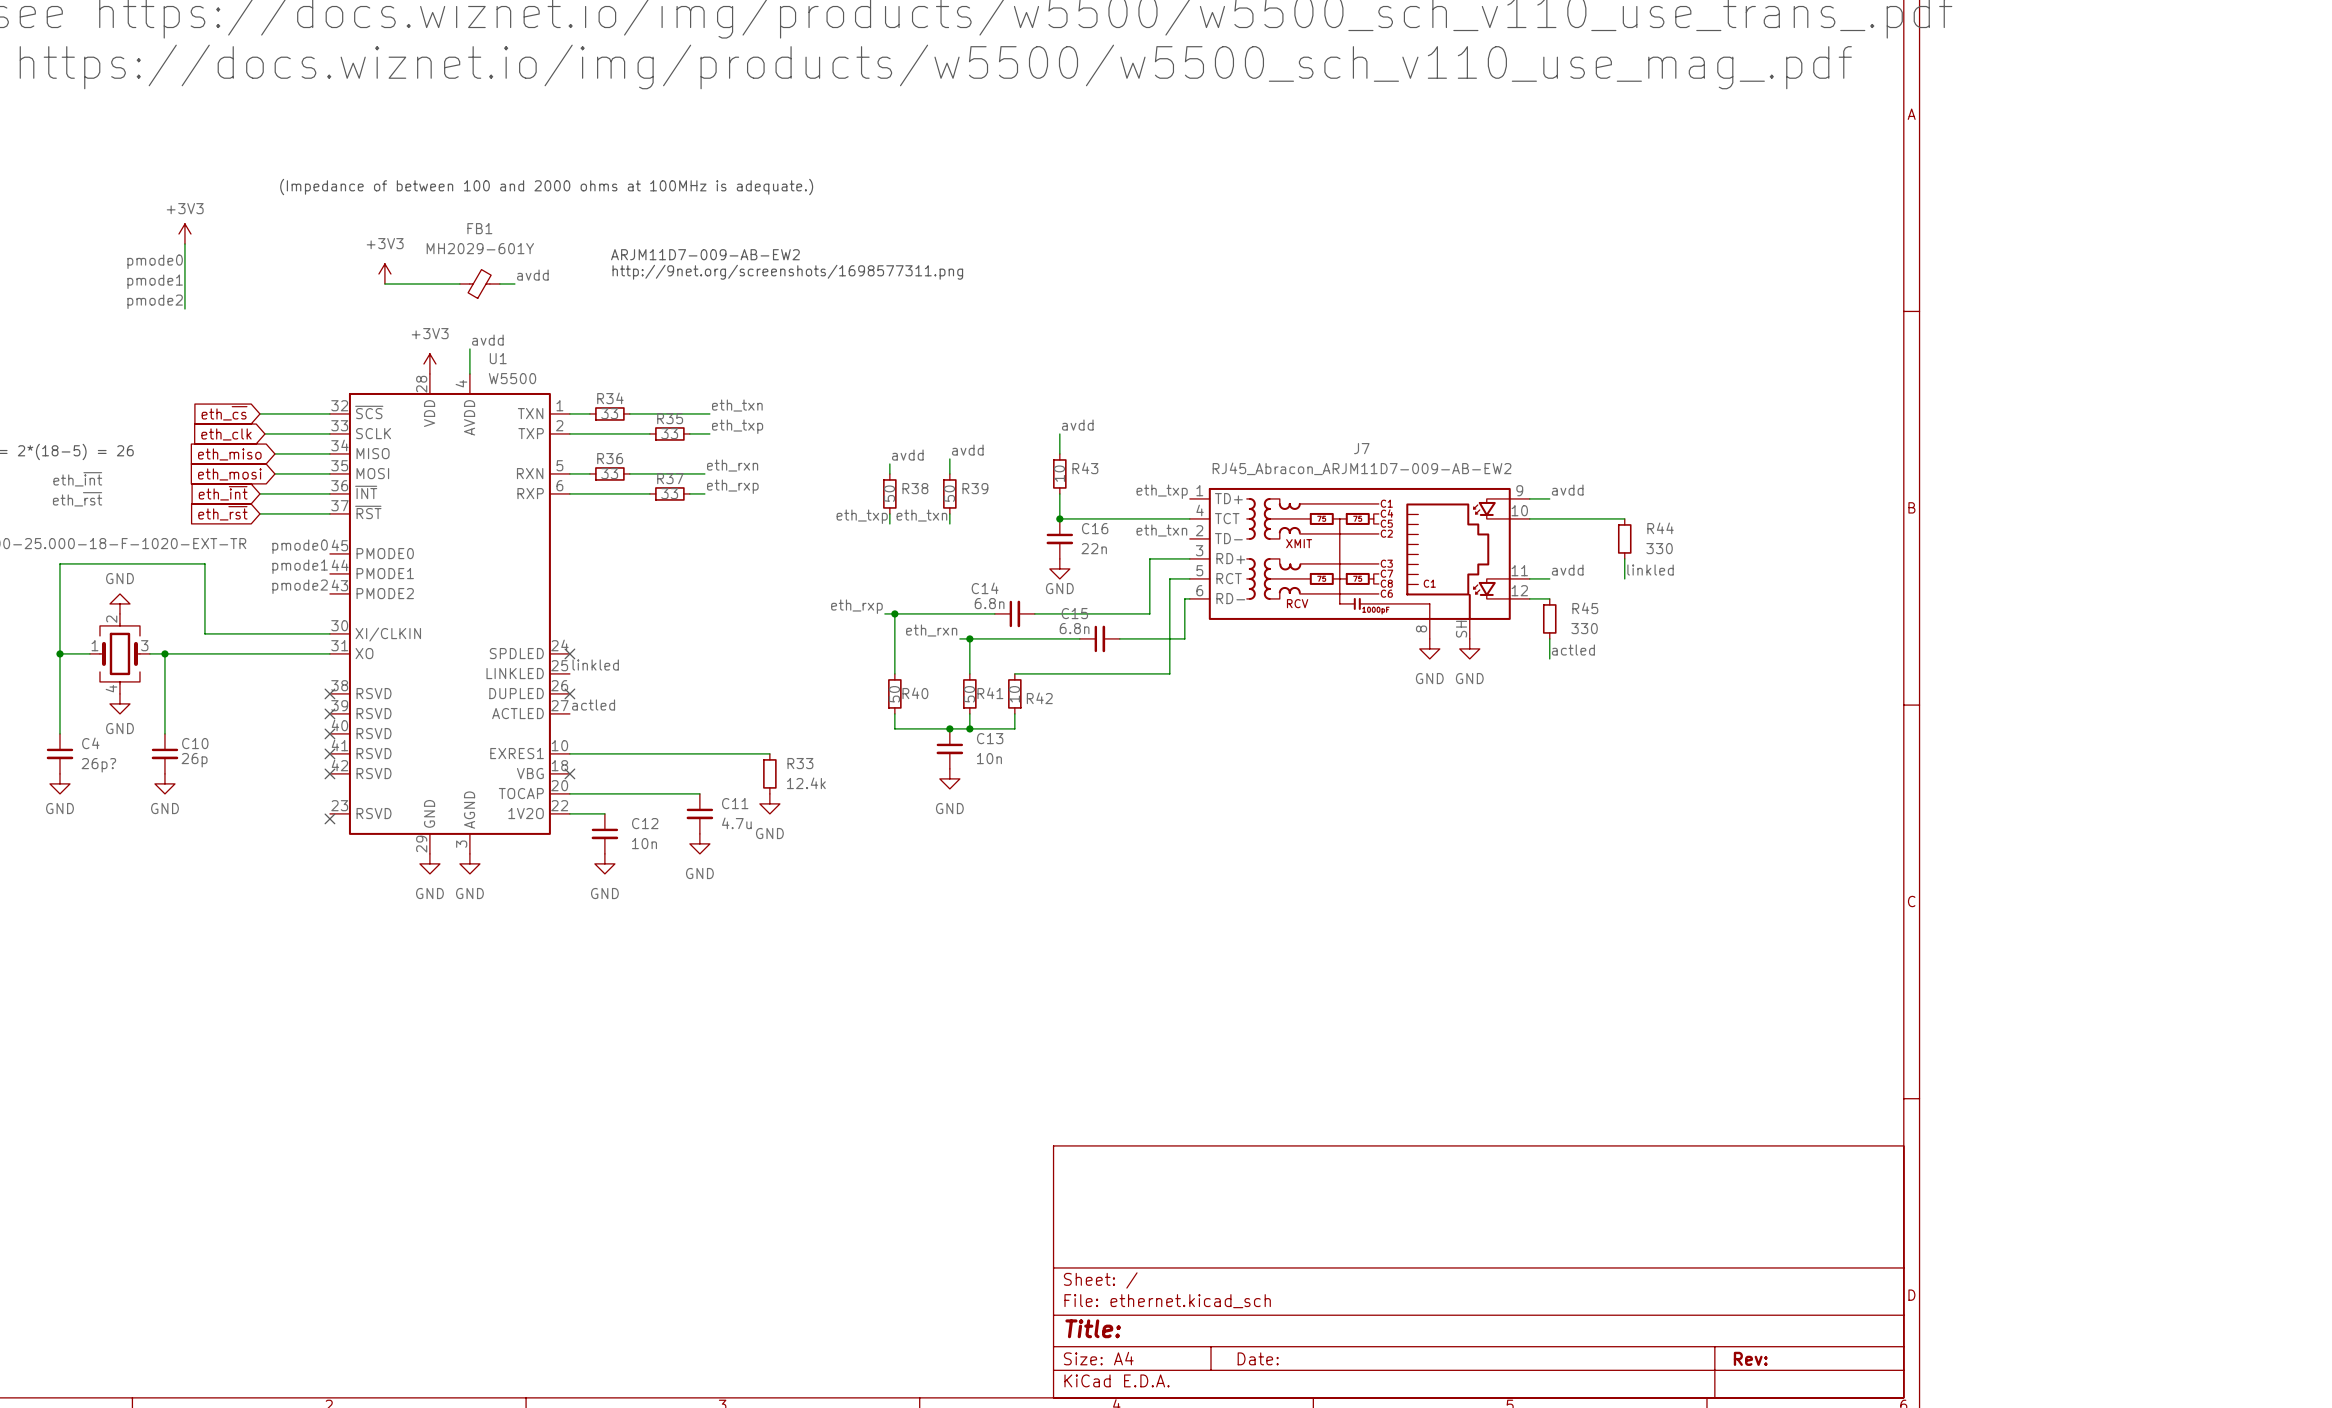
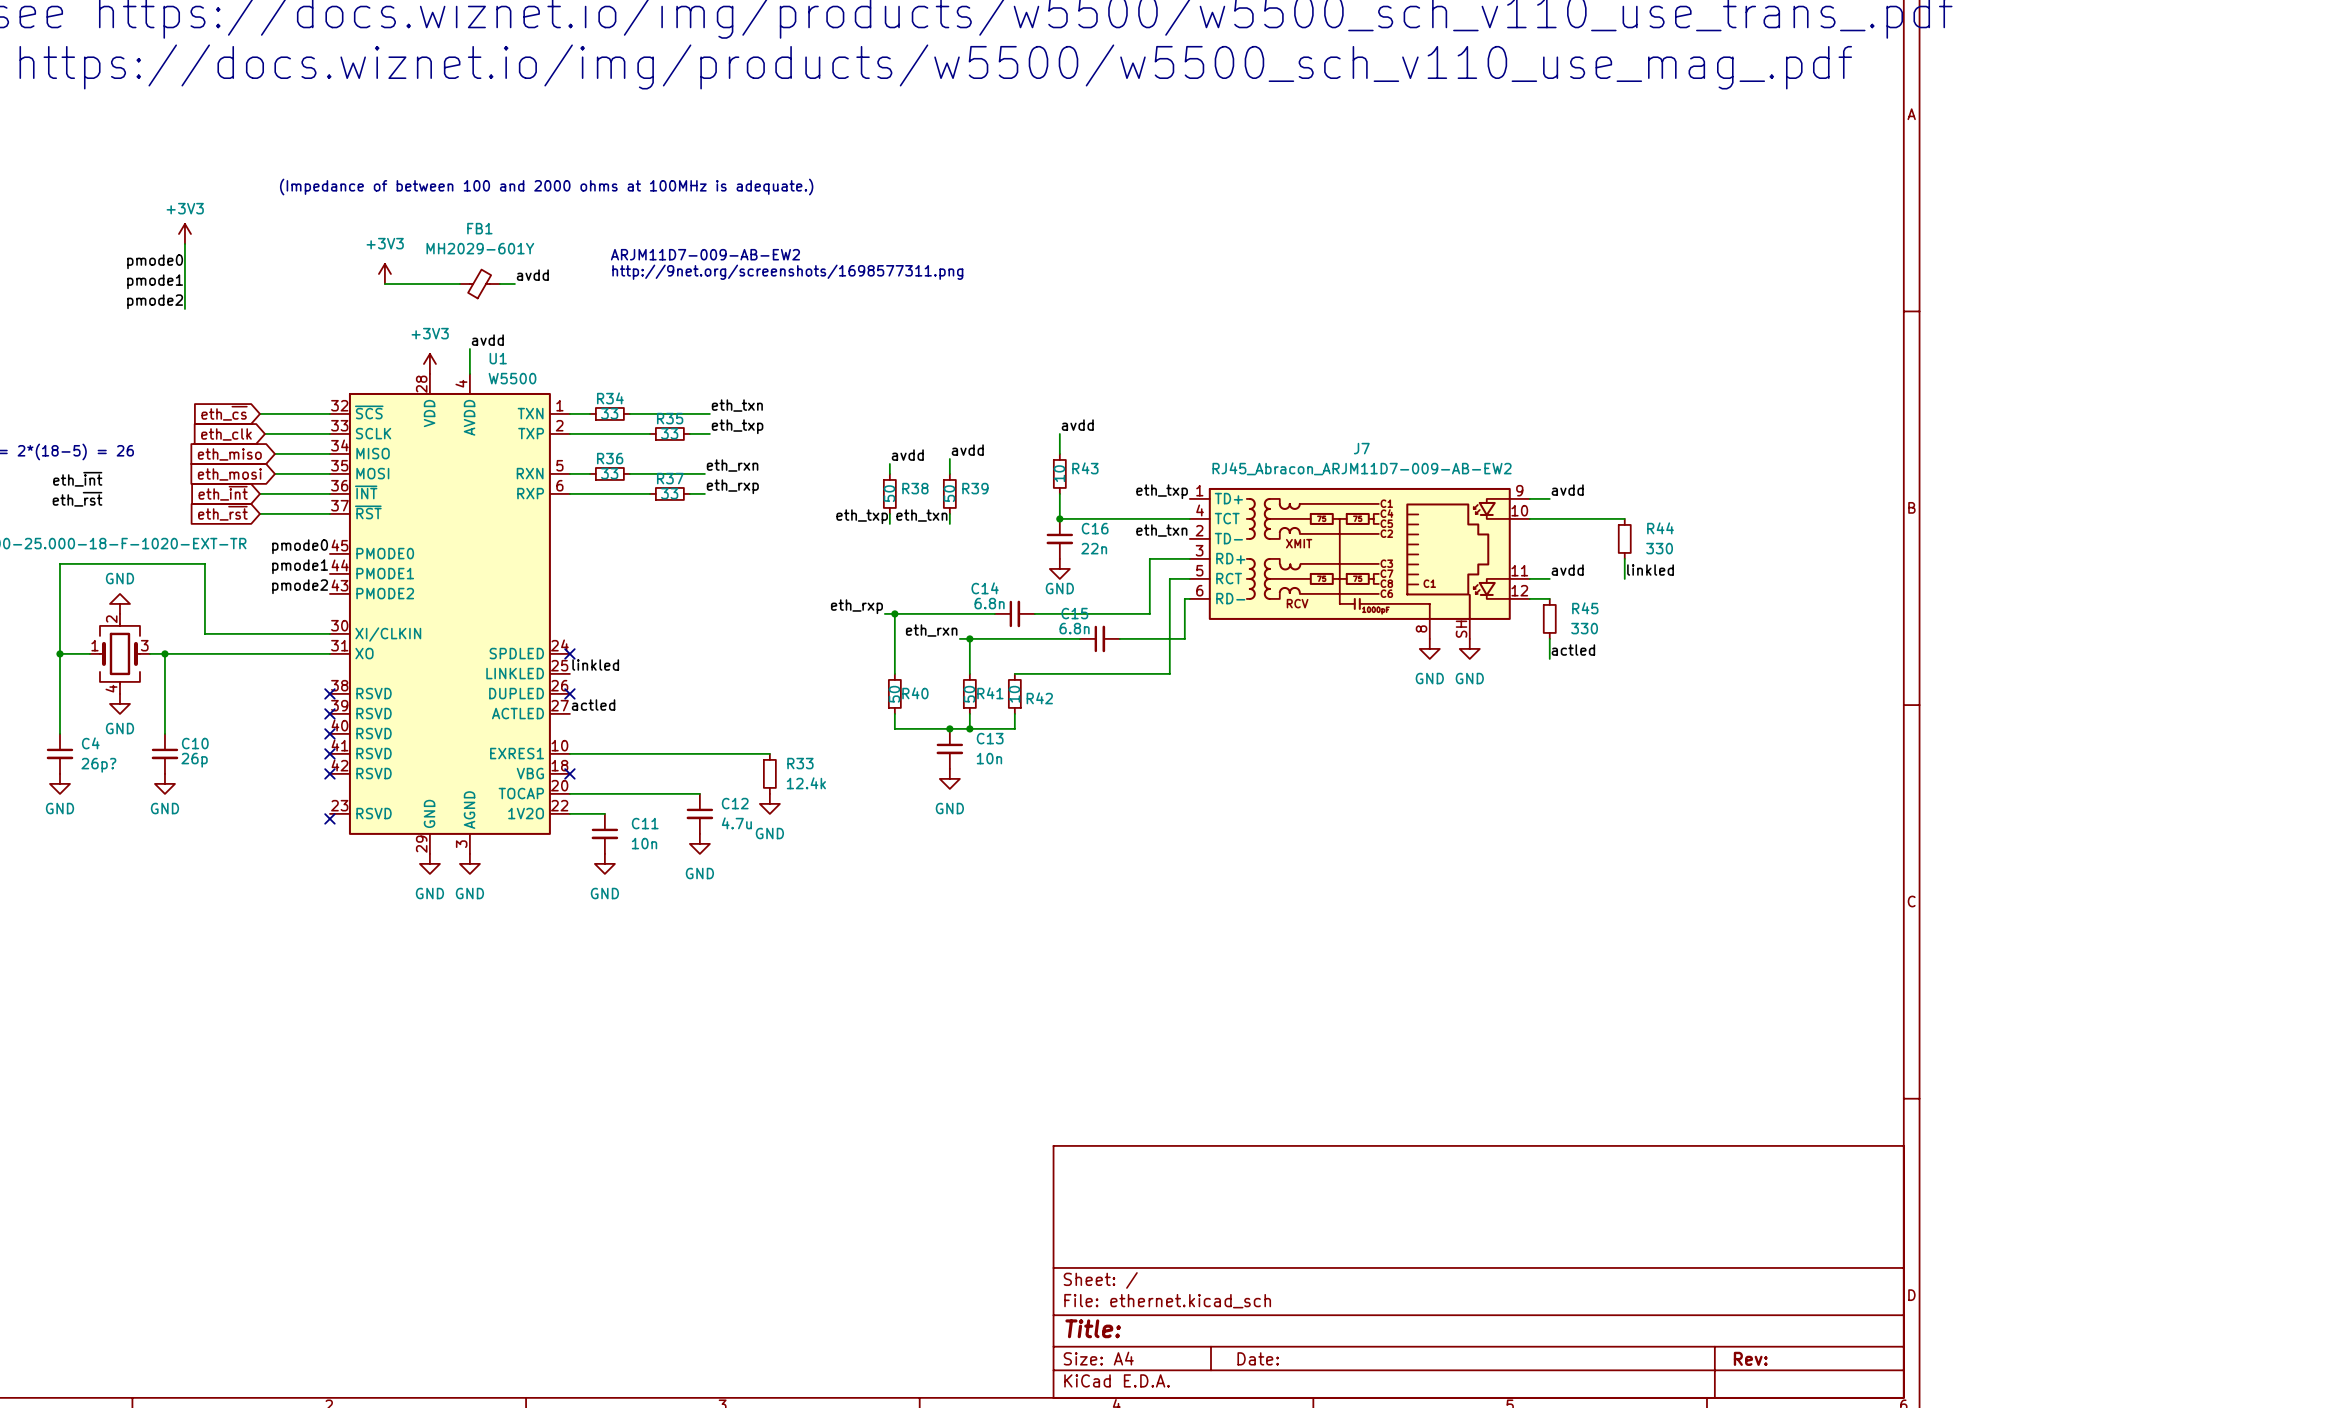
C11 name: C11 (735, 803) -> C12 (735, 803)
C12 name: C12 (645, 823) -> C11 (645, 823)

